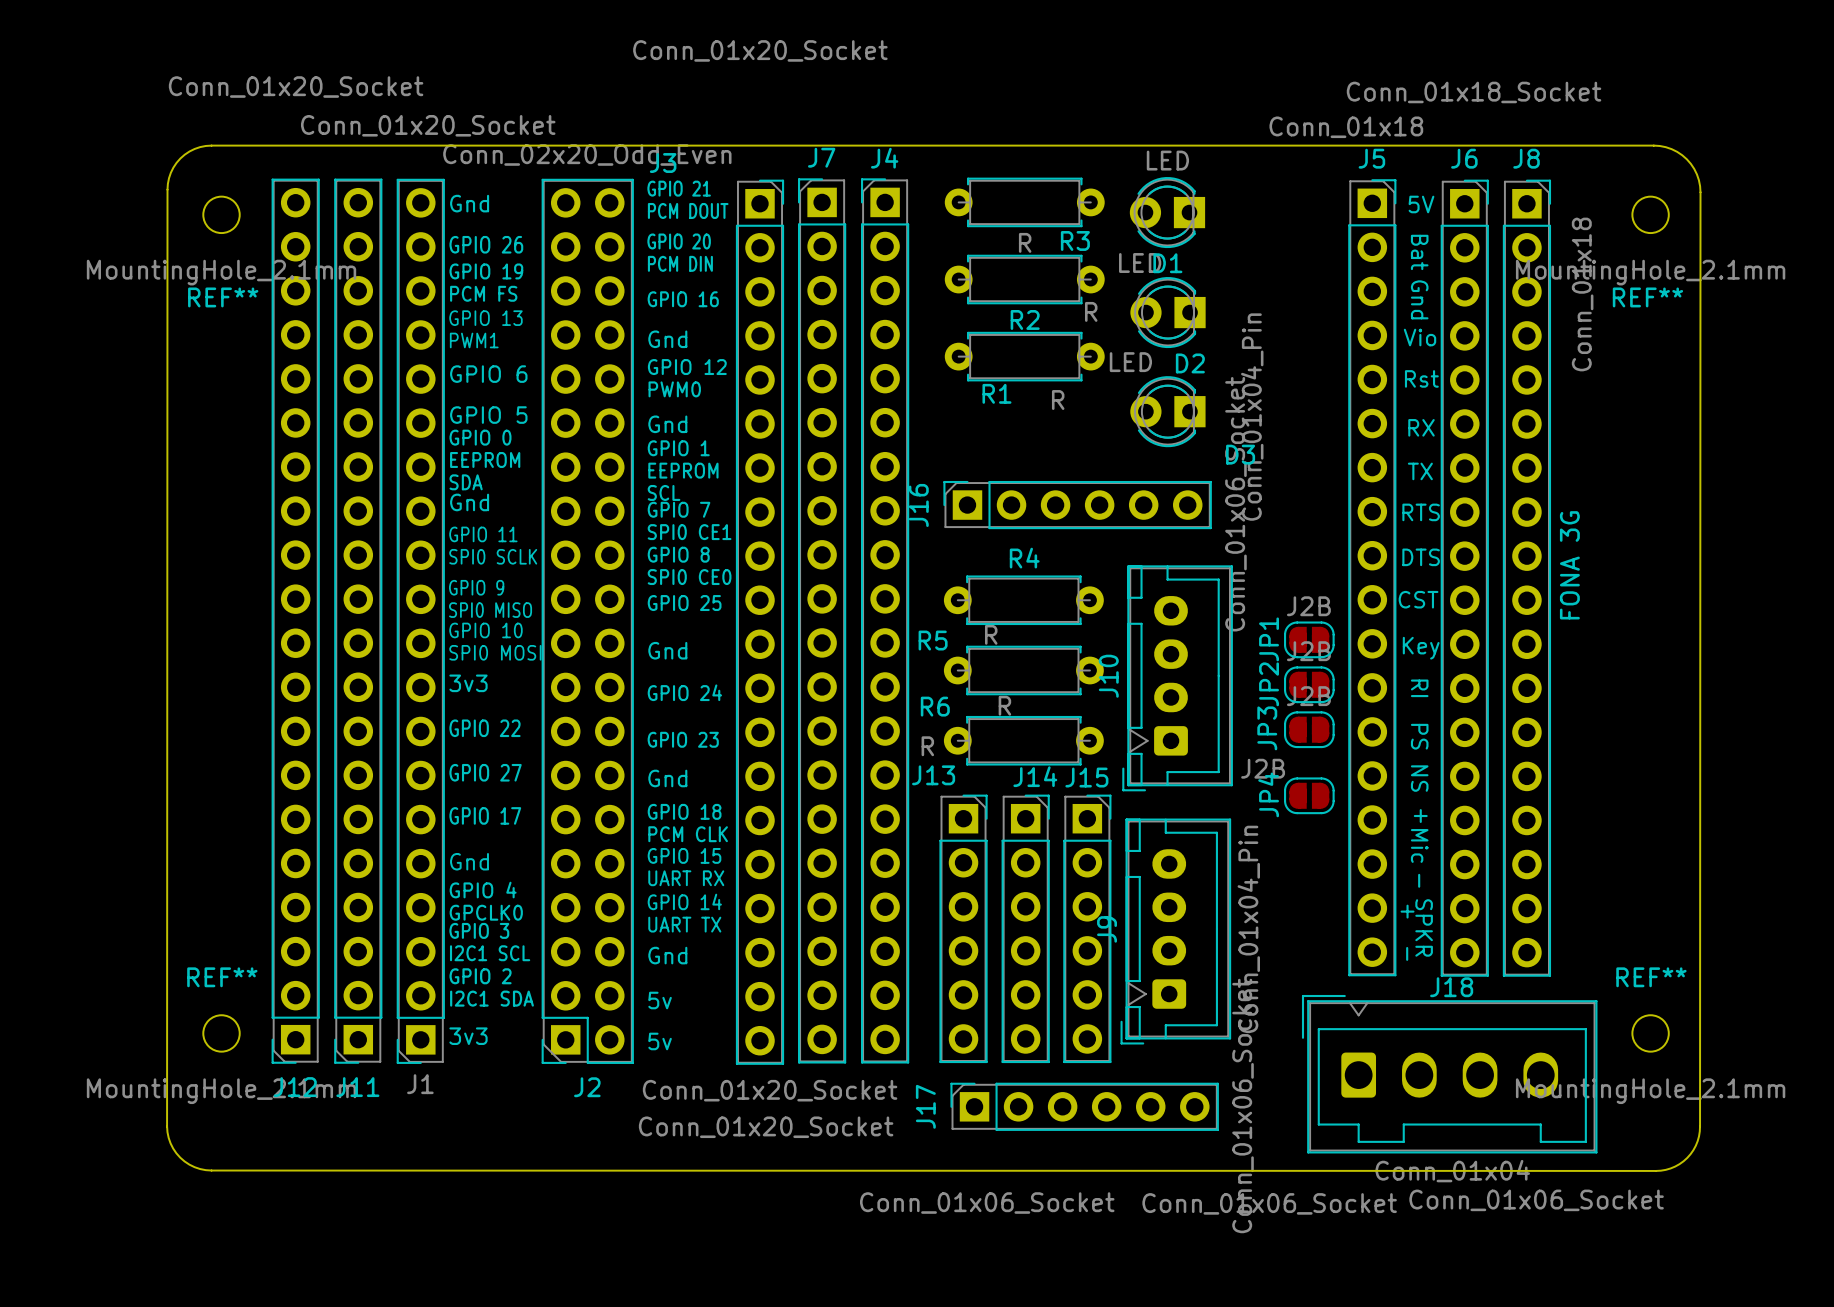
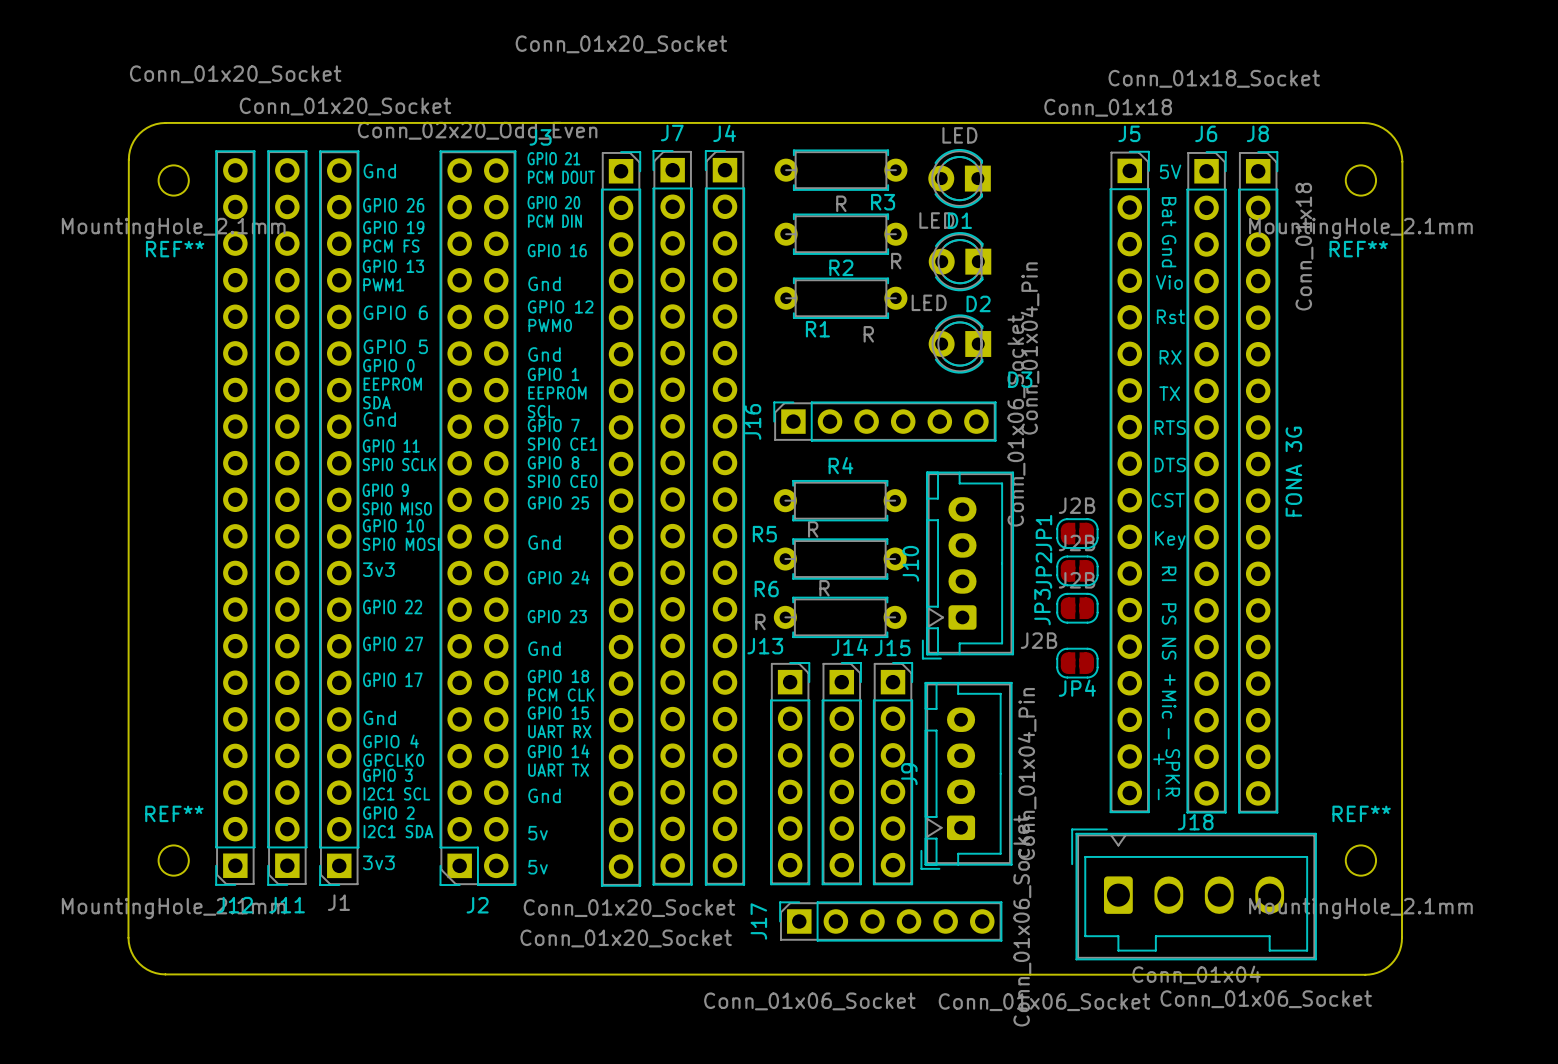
JP4 name rotation: 0° (1268, 794) -> 90° clockwise (1077, 688)

